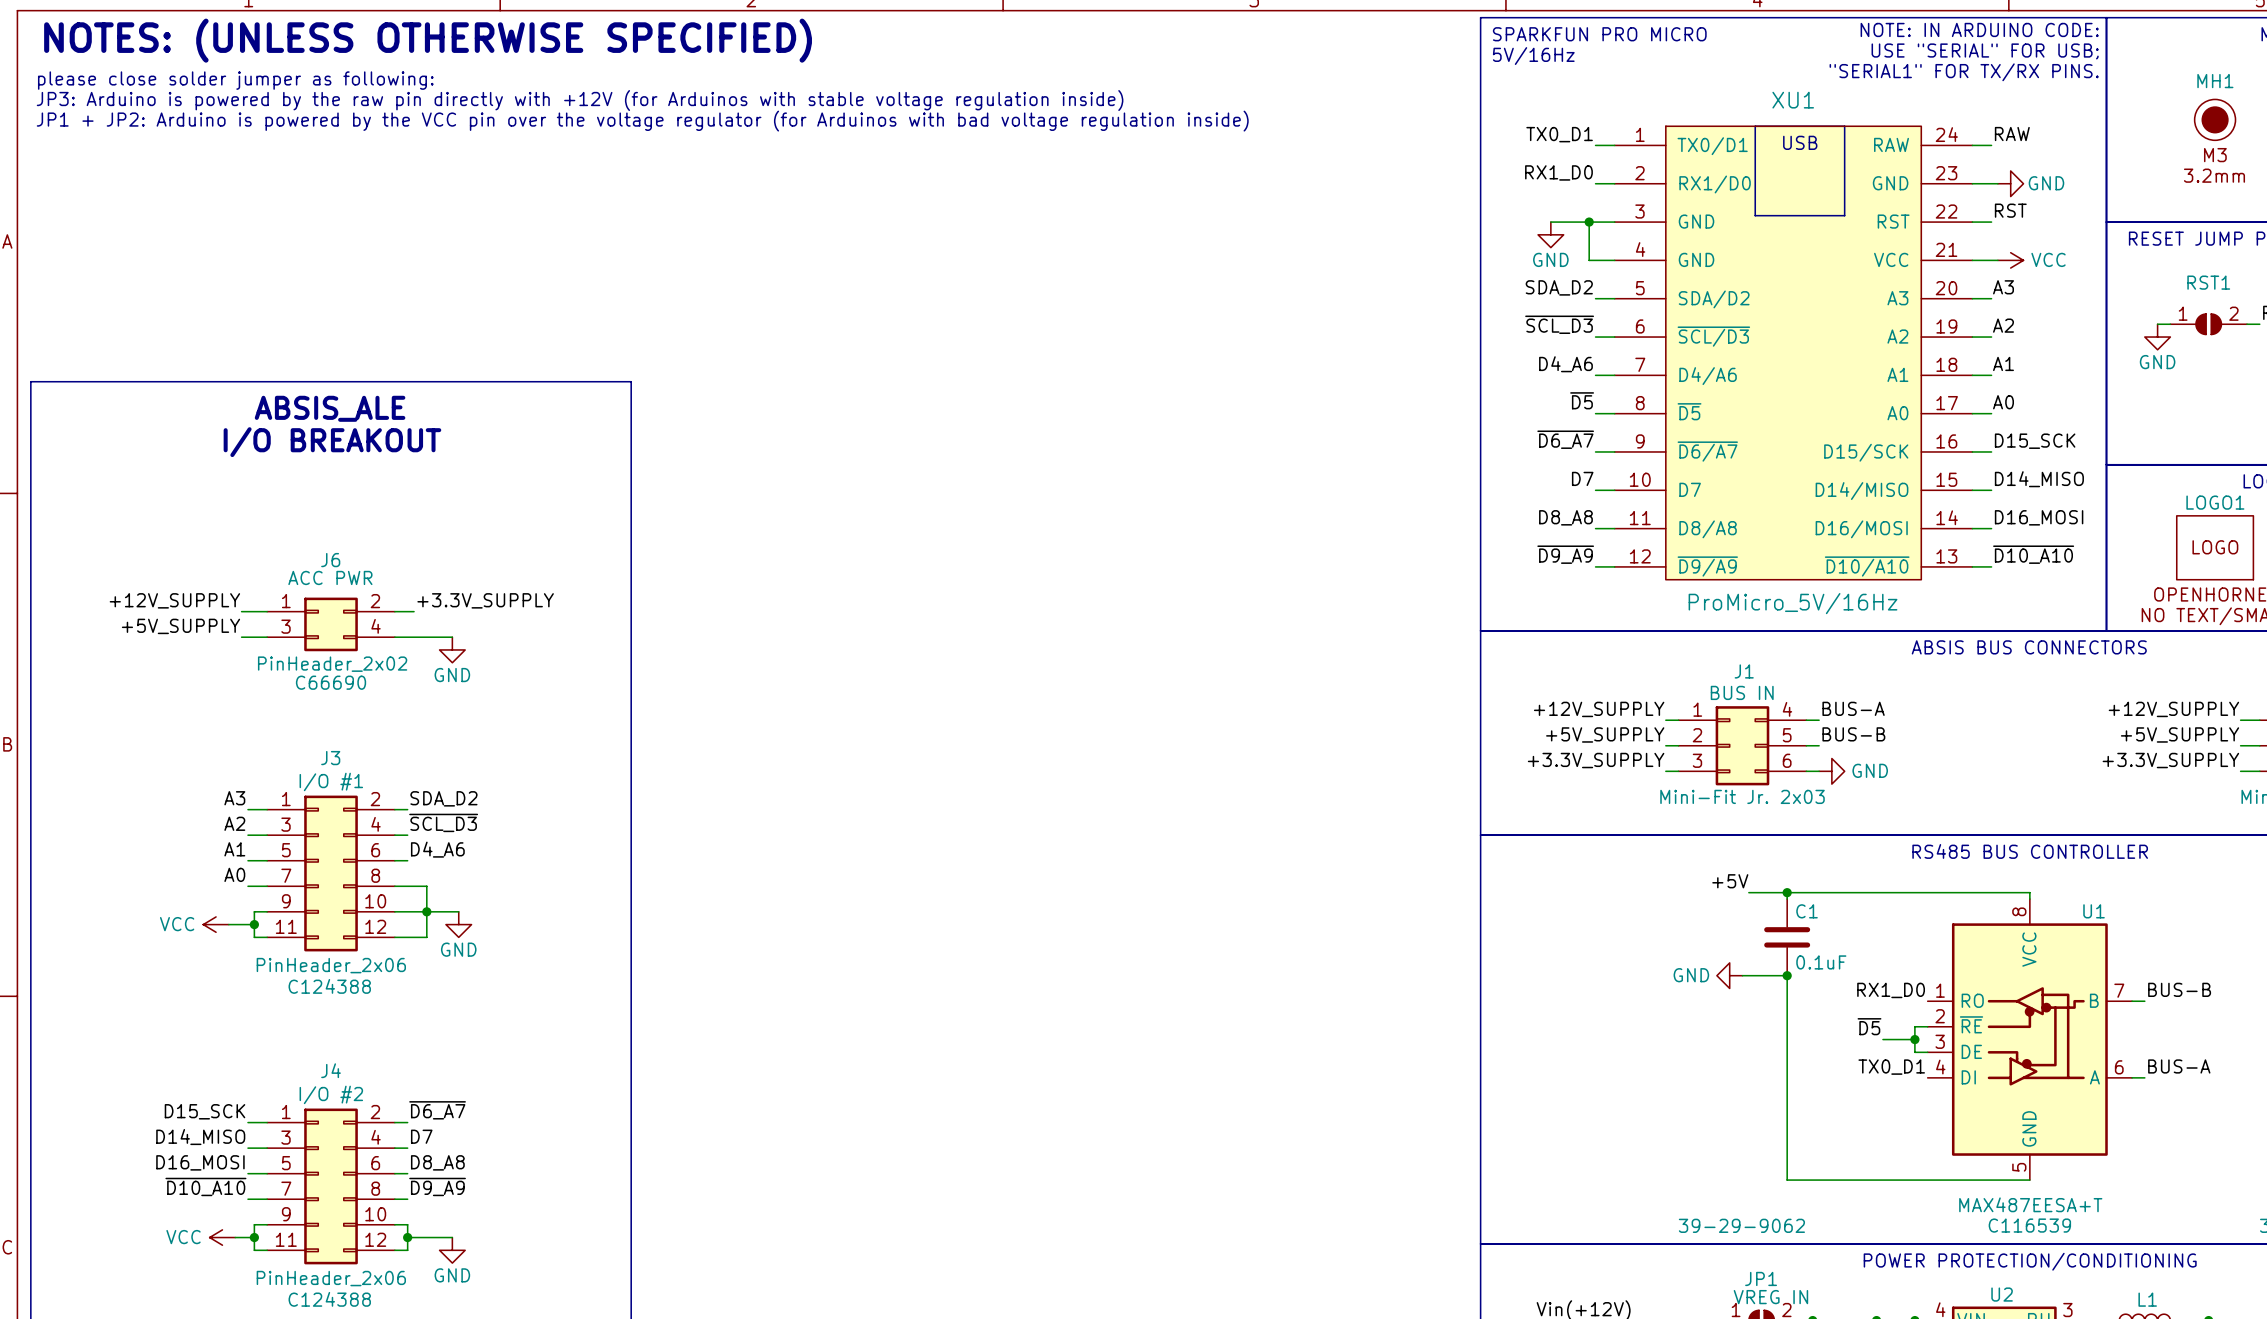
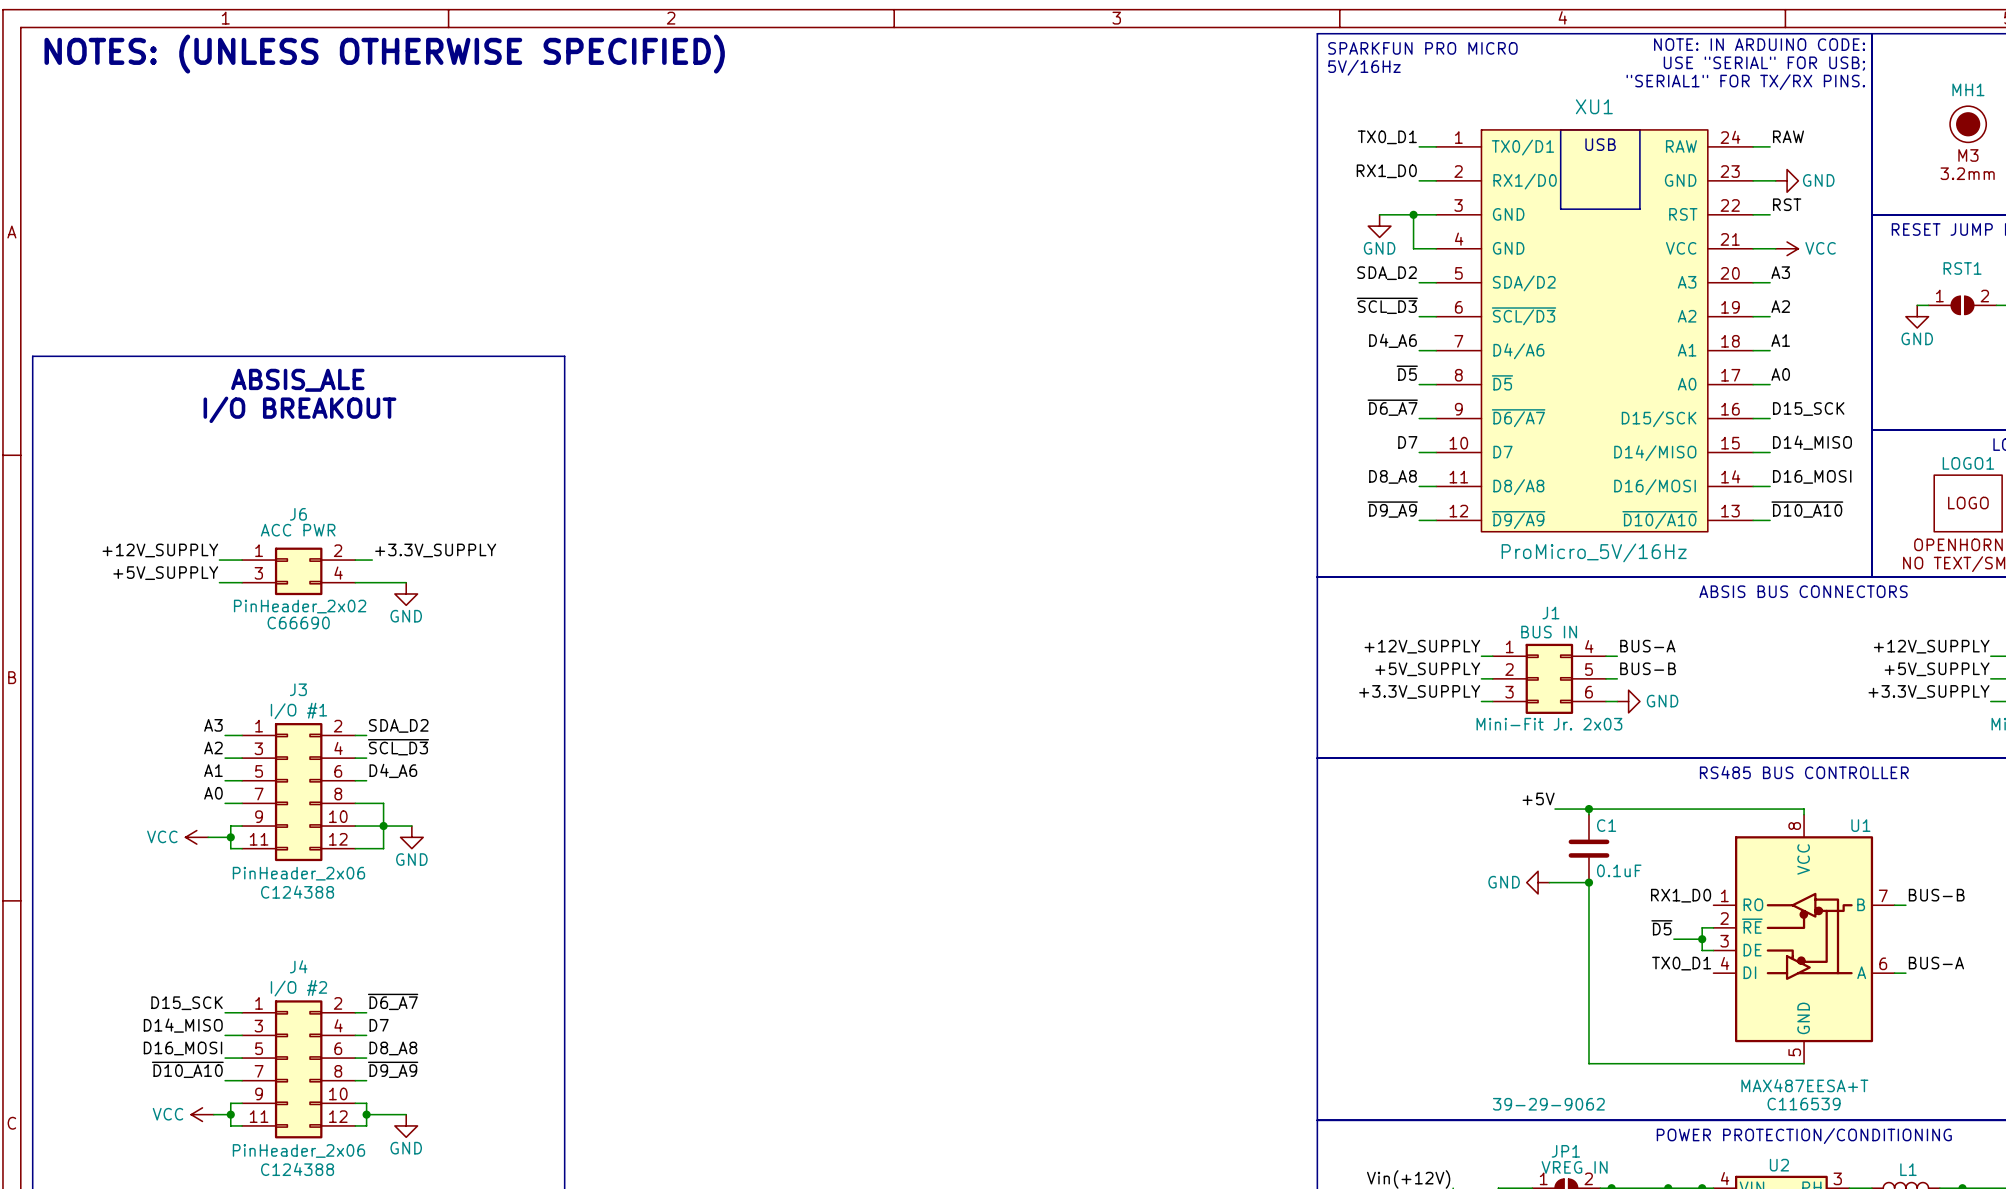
text: please close solder jumper as following: (235, 80) -> none
text: JP3: Arduino is powered by the raw pin directly with +12V (for Arduinos with stable voltage regulation inside) (580, 100) -> none
text: JP1 + JP2: Arduino is powered by the VCC pin over the voltage regulator (for Arduinos with bad voltage regulation inside) (642, 121) -> none

